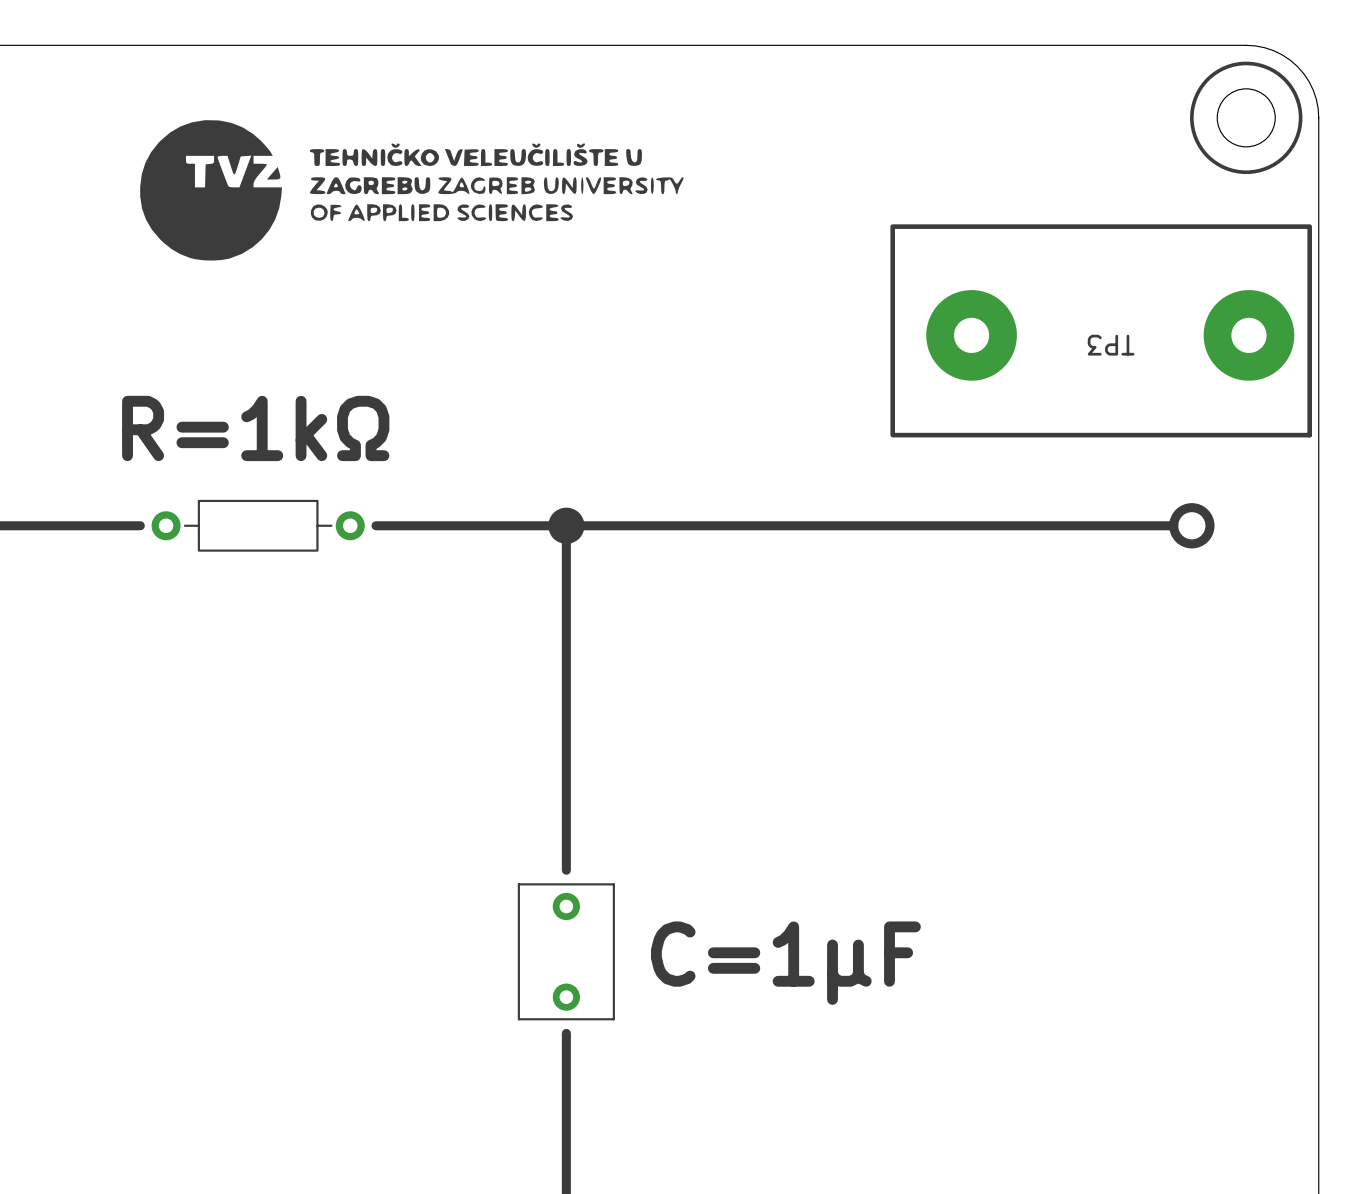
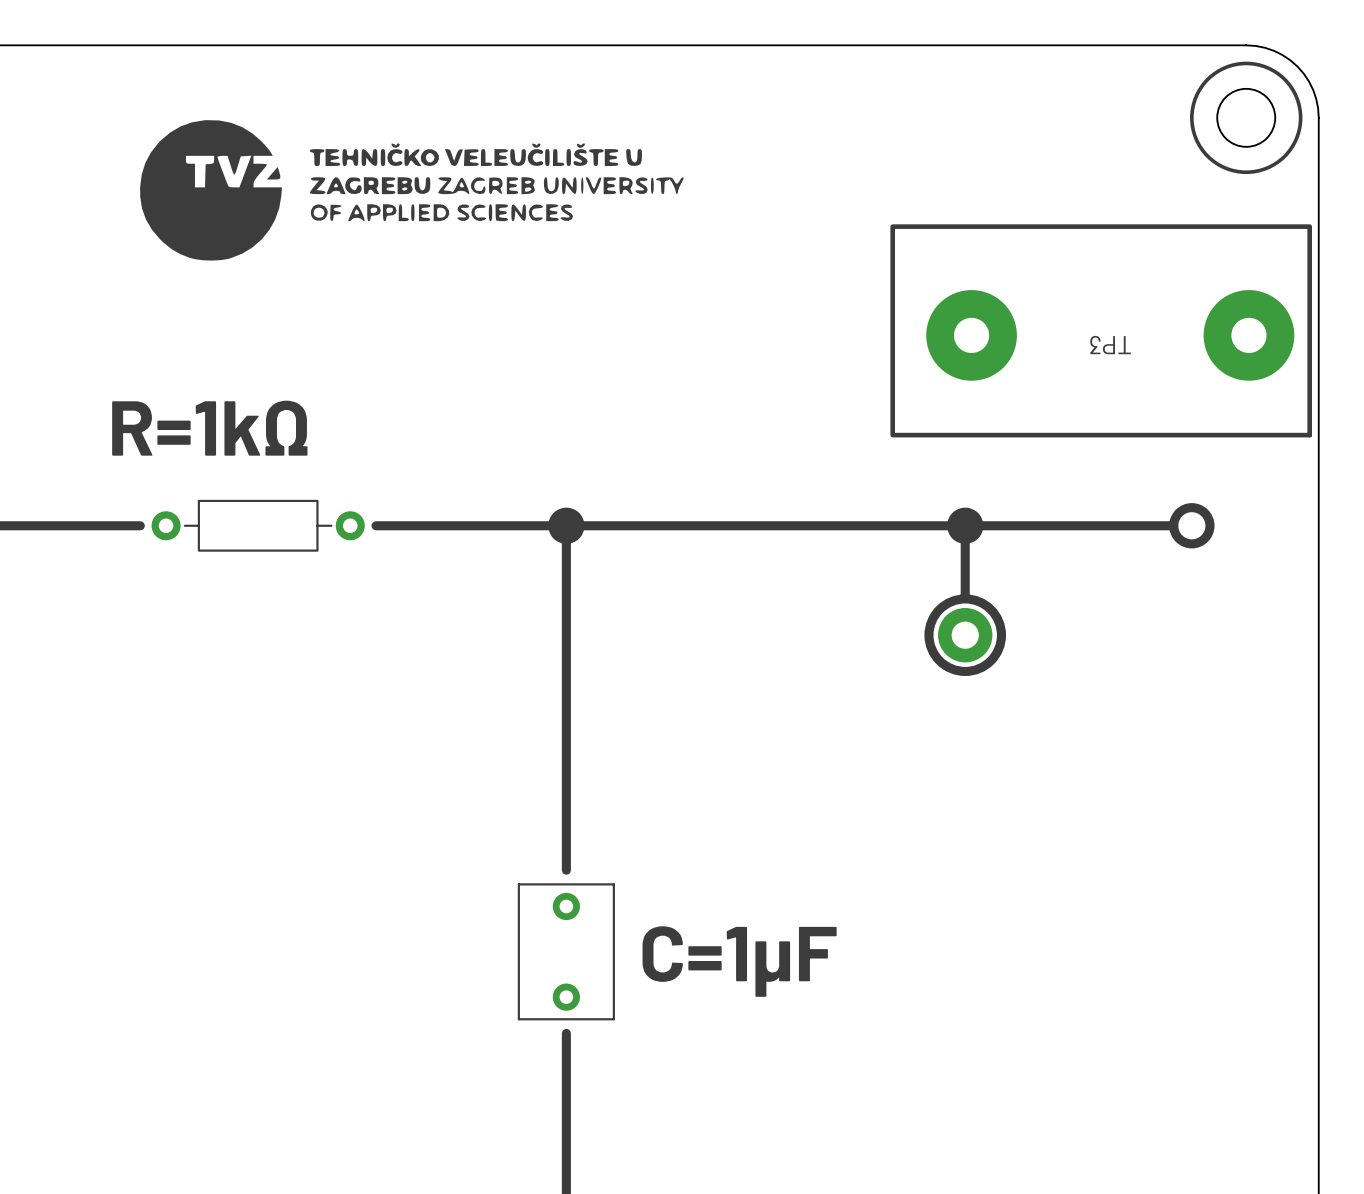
drawing: none -> [947, 507, 984, 544]
line: none -> (965, 525) (965, 598)
part: none -> (965, 635)

